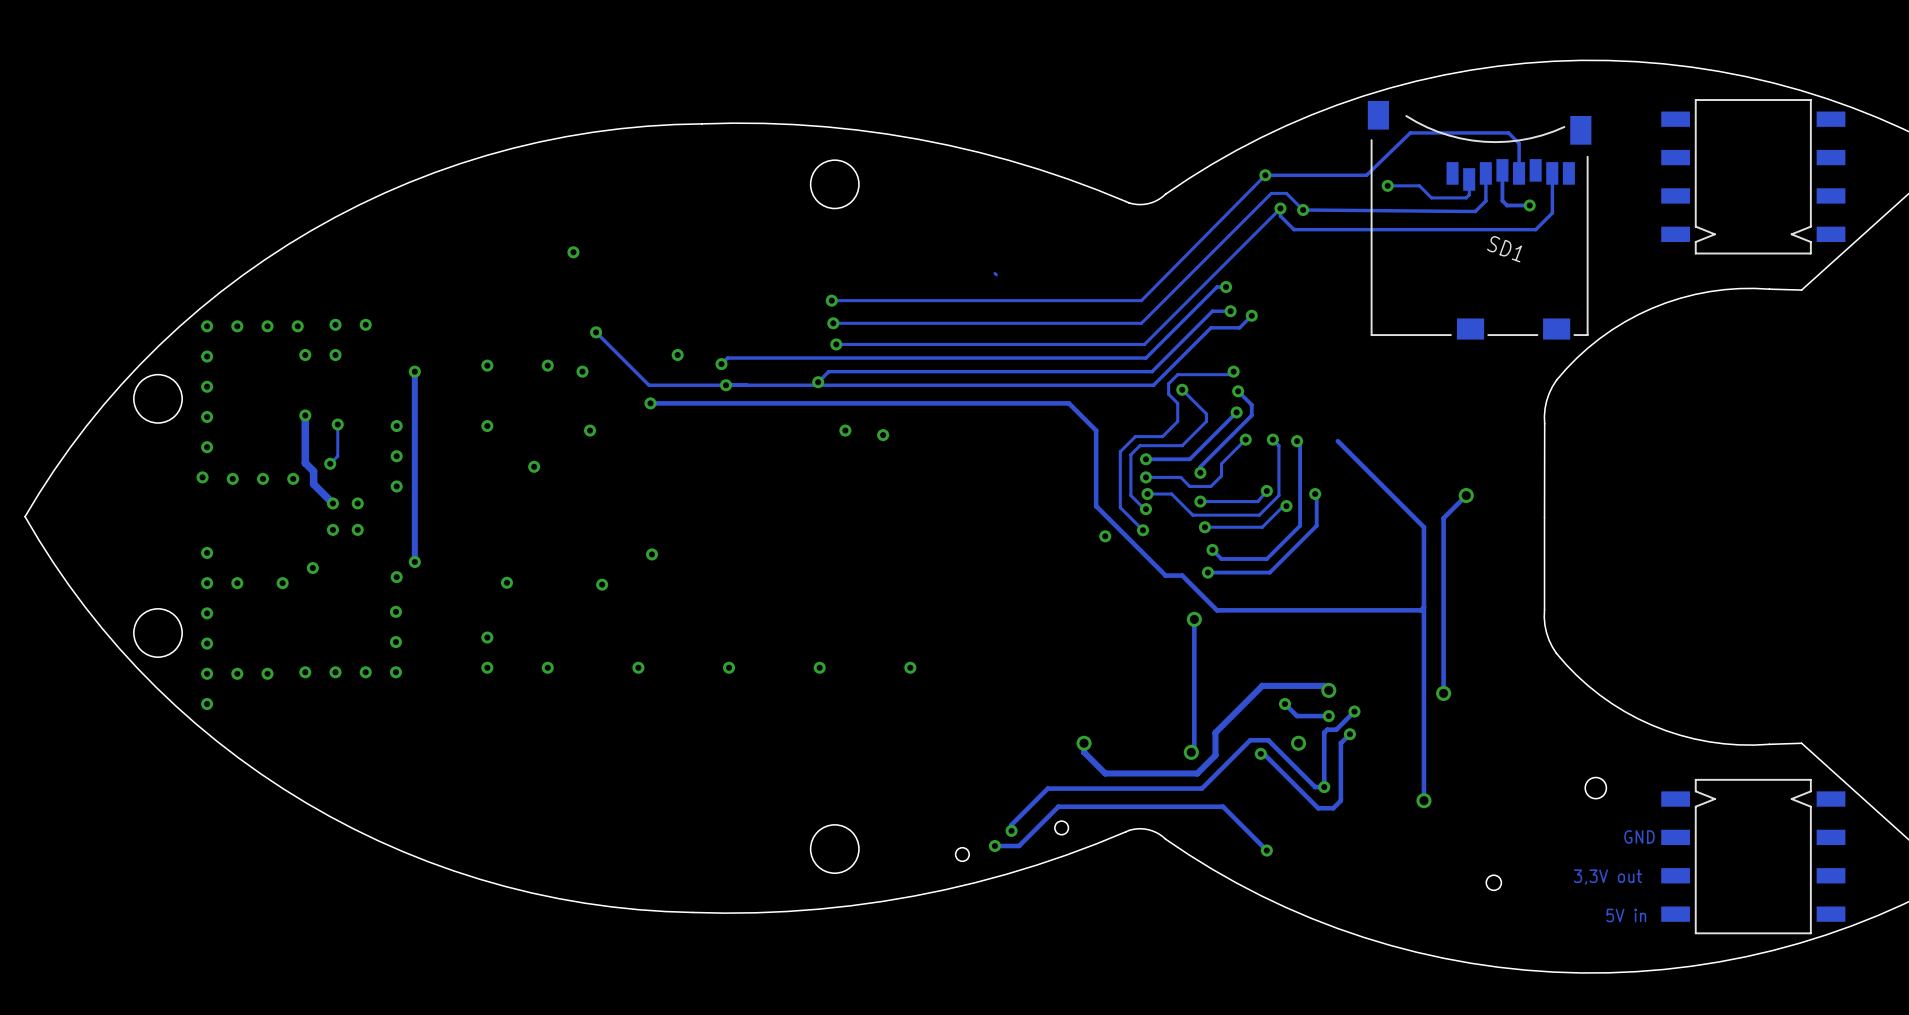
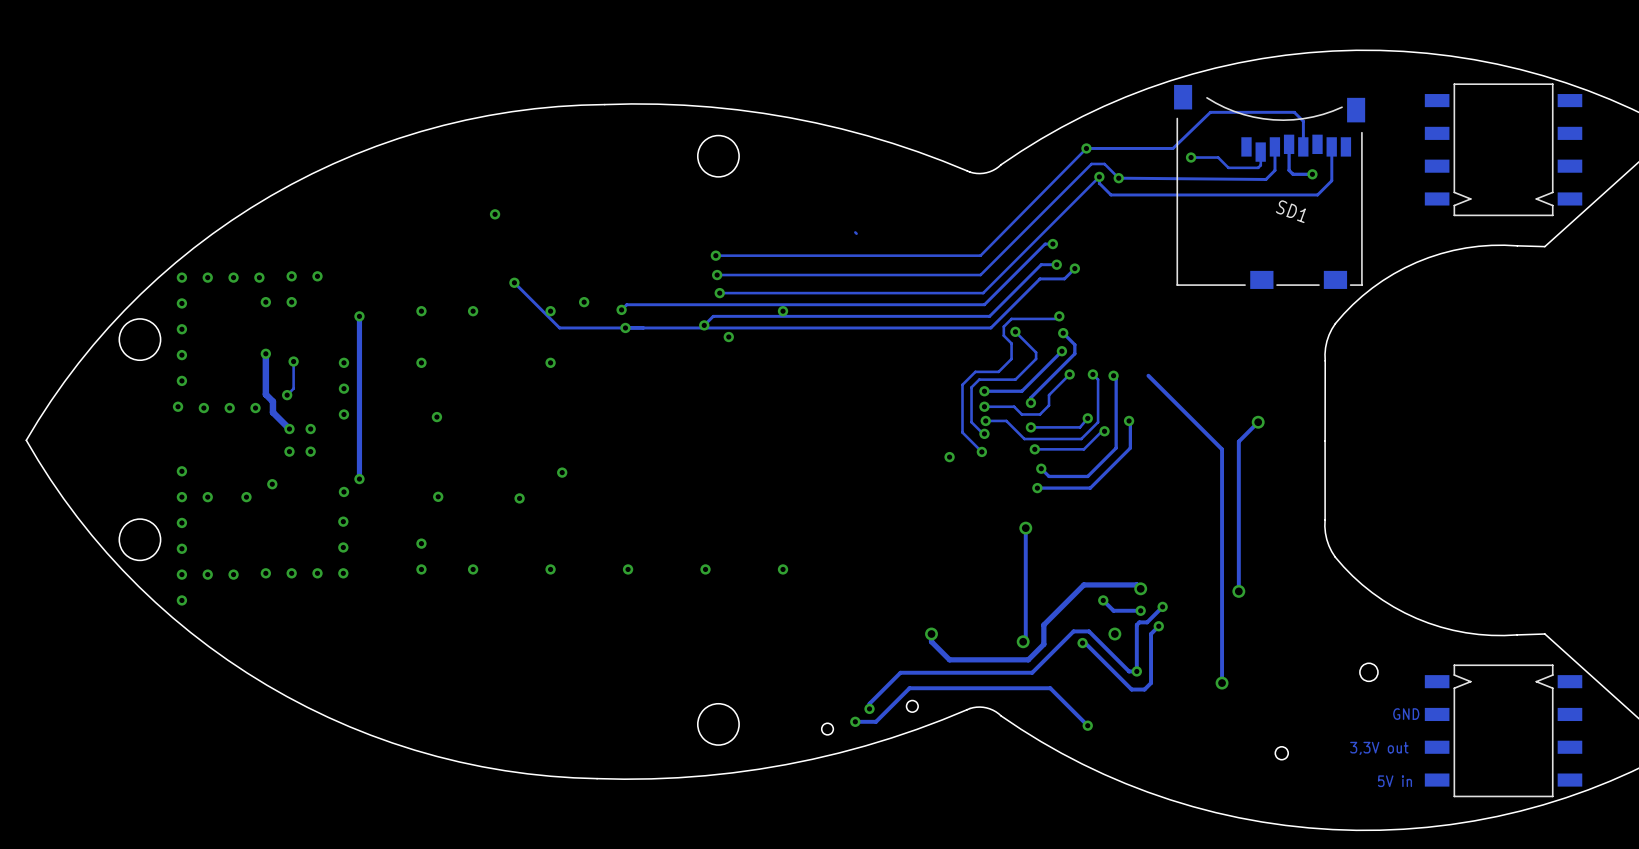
via: none -> (550, 311)
via: none -> (783, 311)
via: (582, 371) -> none
via: none -> (728, 337)
track: (650, 403) (1068, 403) (1096, 430) (1096, 506) (1165, 575) (1182, 575) (1217, 610) (1420, 610) (1423, 607) -> none
via: (650, 403) -> none
via: none -> (550, 362)
via: (590, 430) -> none
via: (845, 430) -> none
via: (883, 435) -> none
via position: (534, 466) -> (436, 417)

